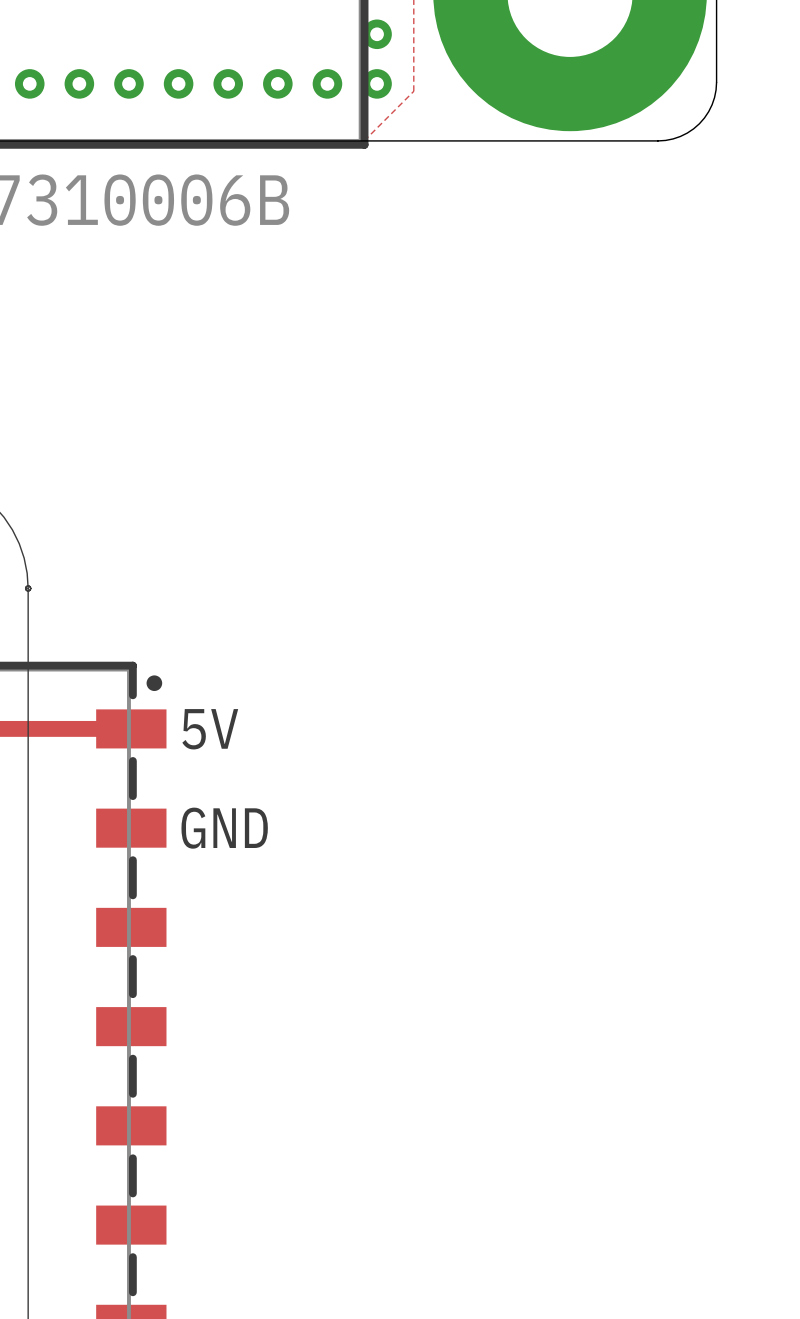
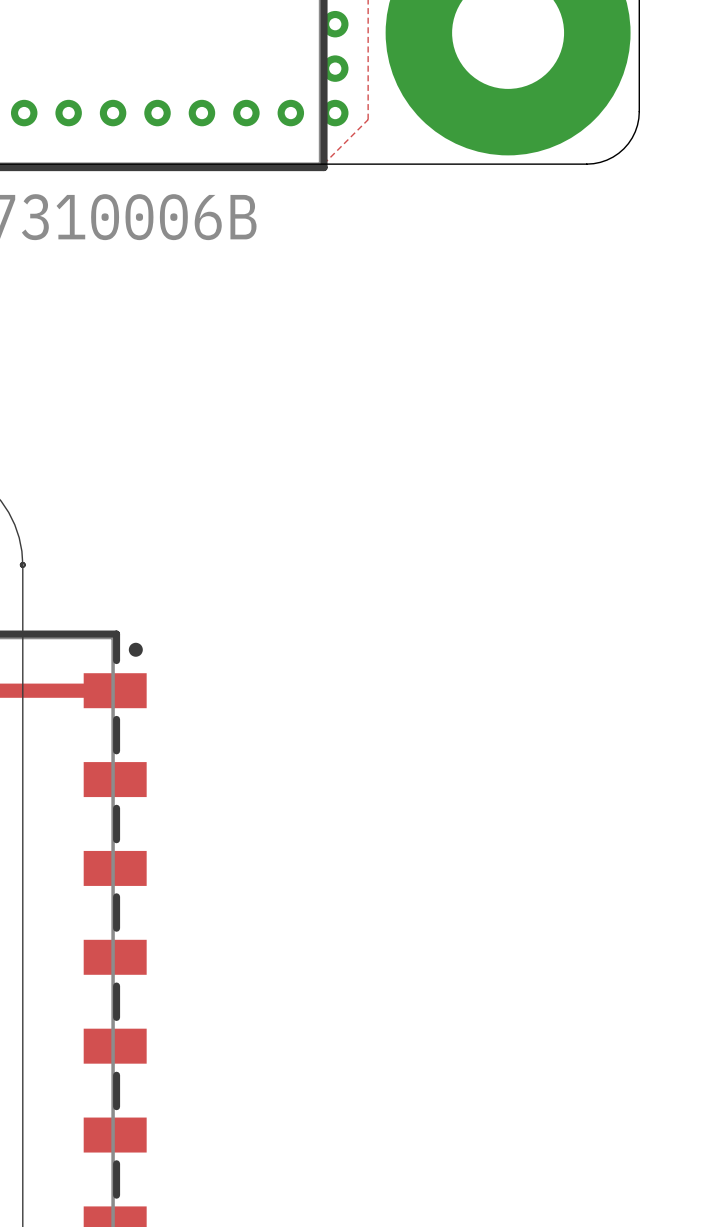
text: 5V (210, 729) -> none
text: GND (224, 828) -> none

